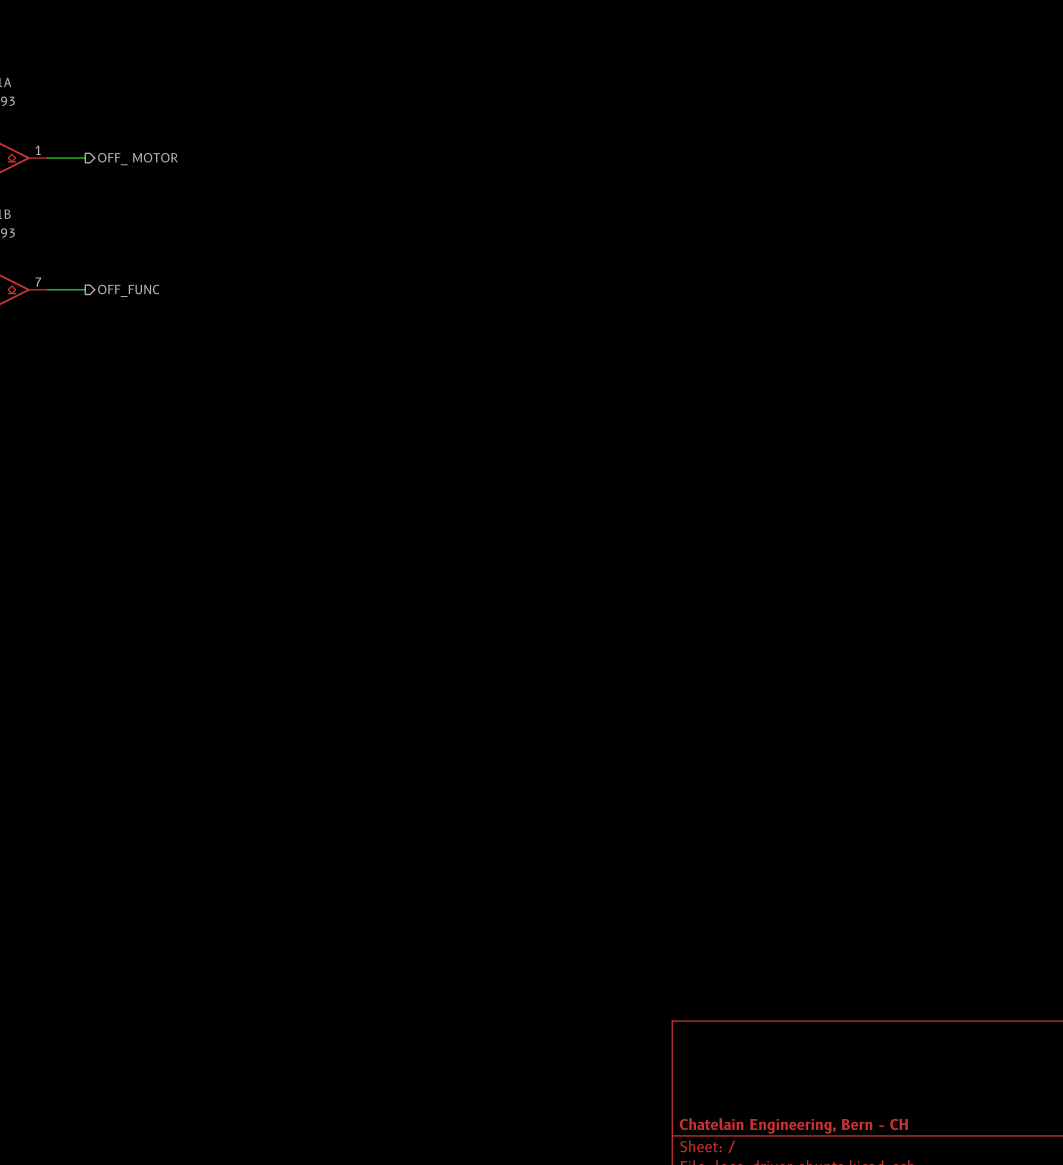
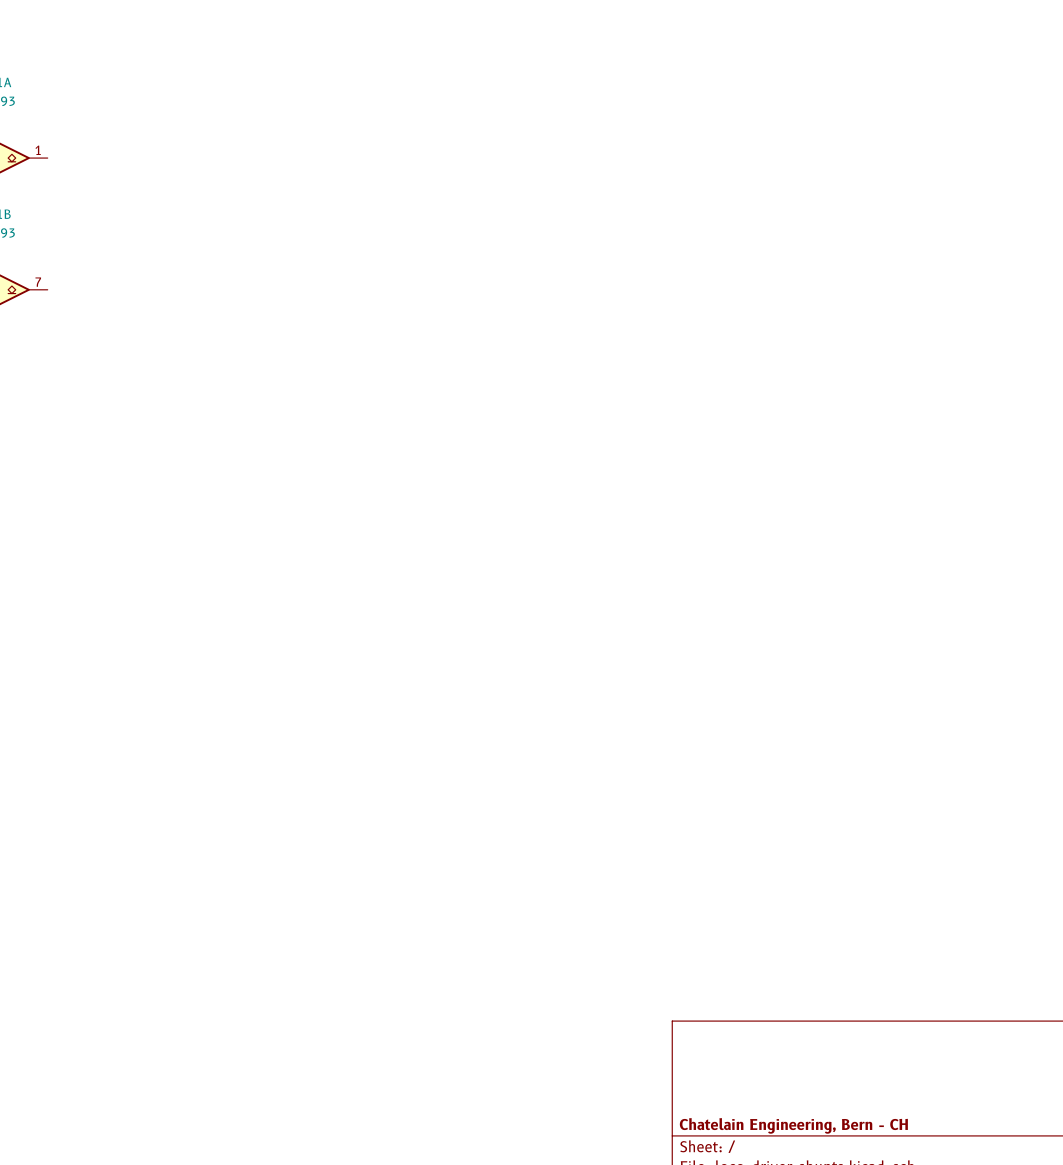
wire: (47, 158) (85, 158) -> none
hierarchical label: OFF_ MOTOR (138, 159) -> none
wire: (47, 289) (85, 289) -> none
hierarchical label: OFF_FUNC (128, 290) -> none

